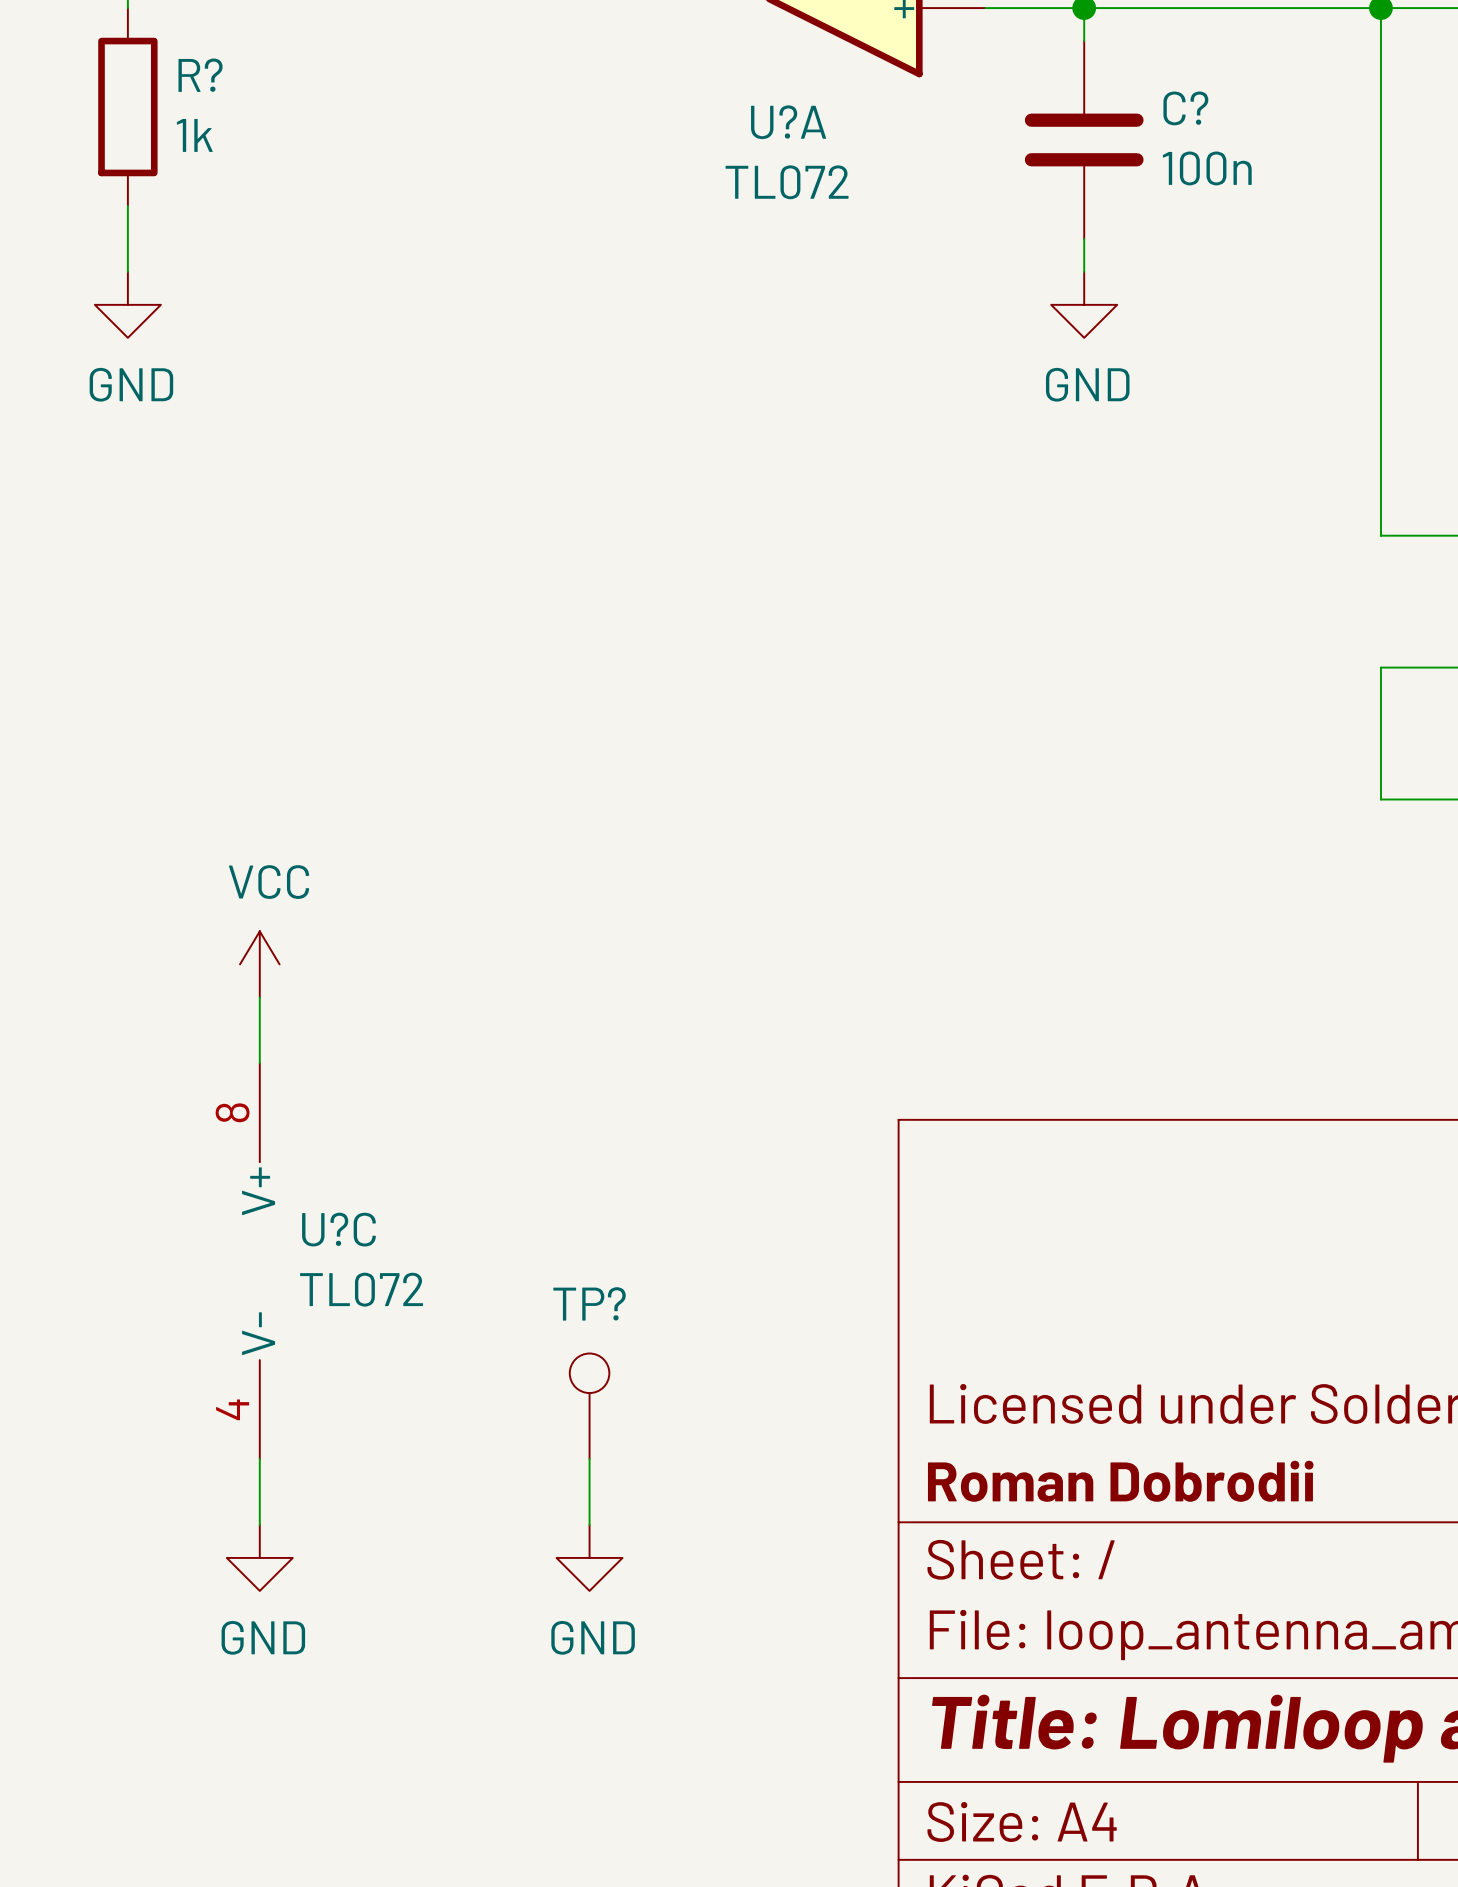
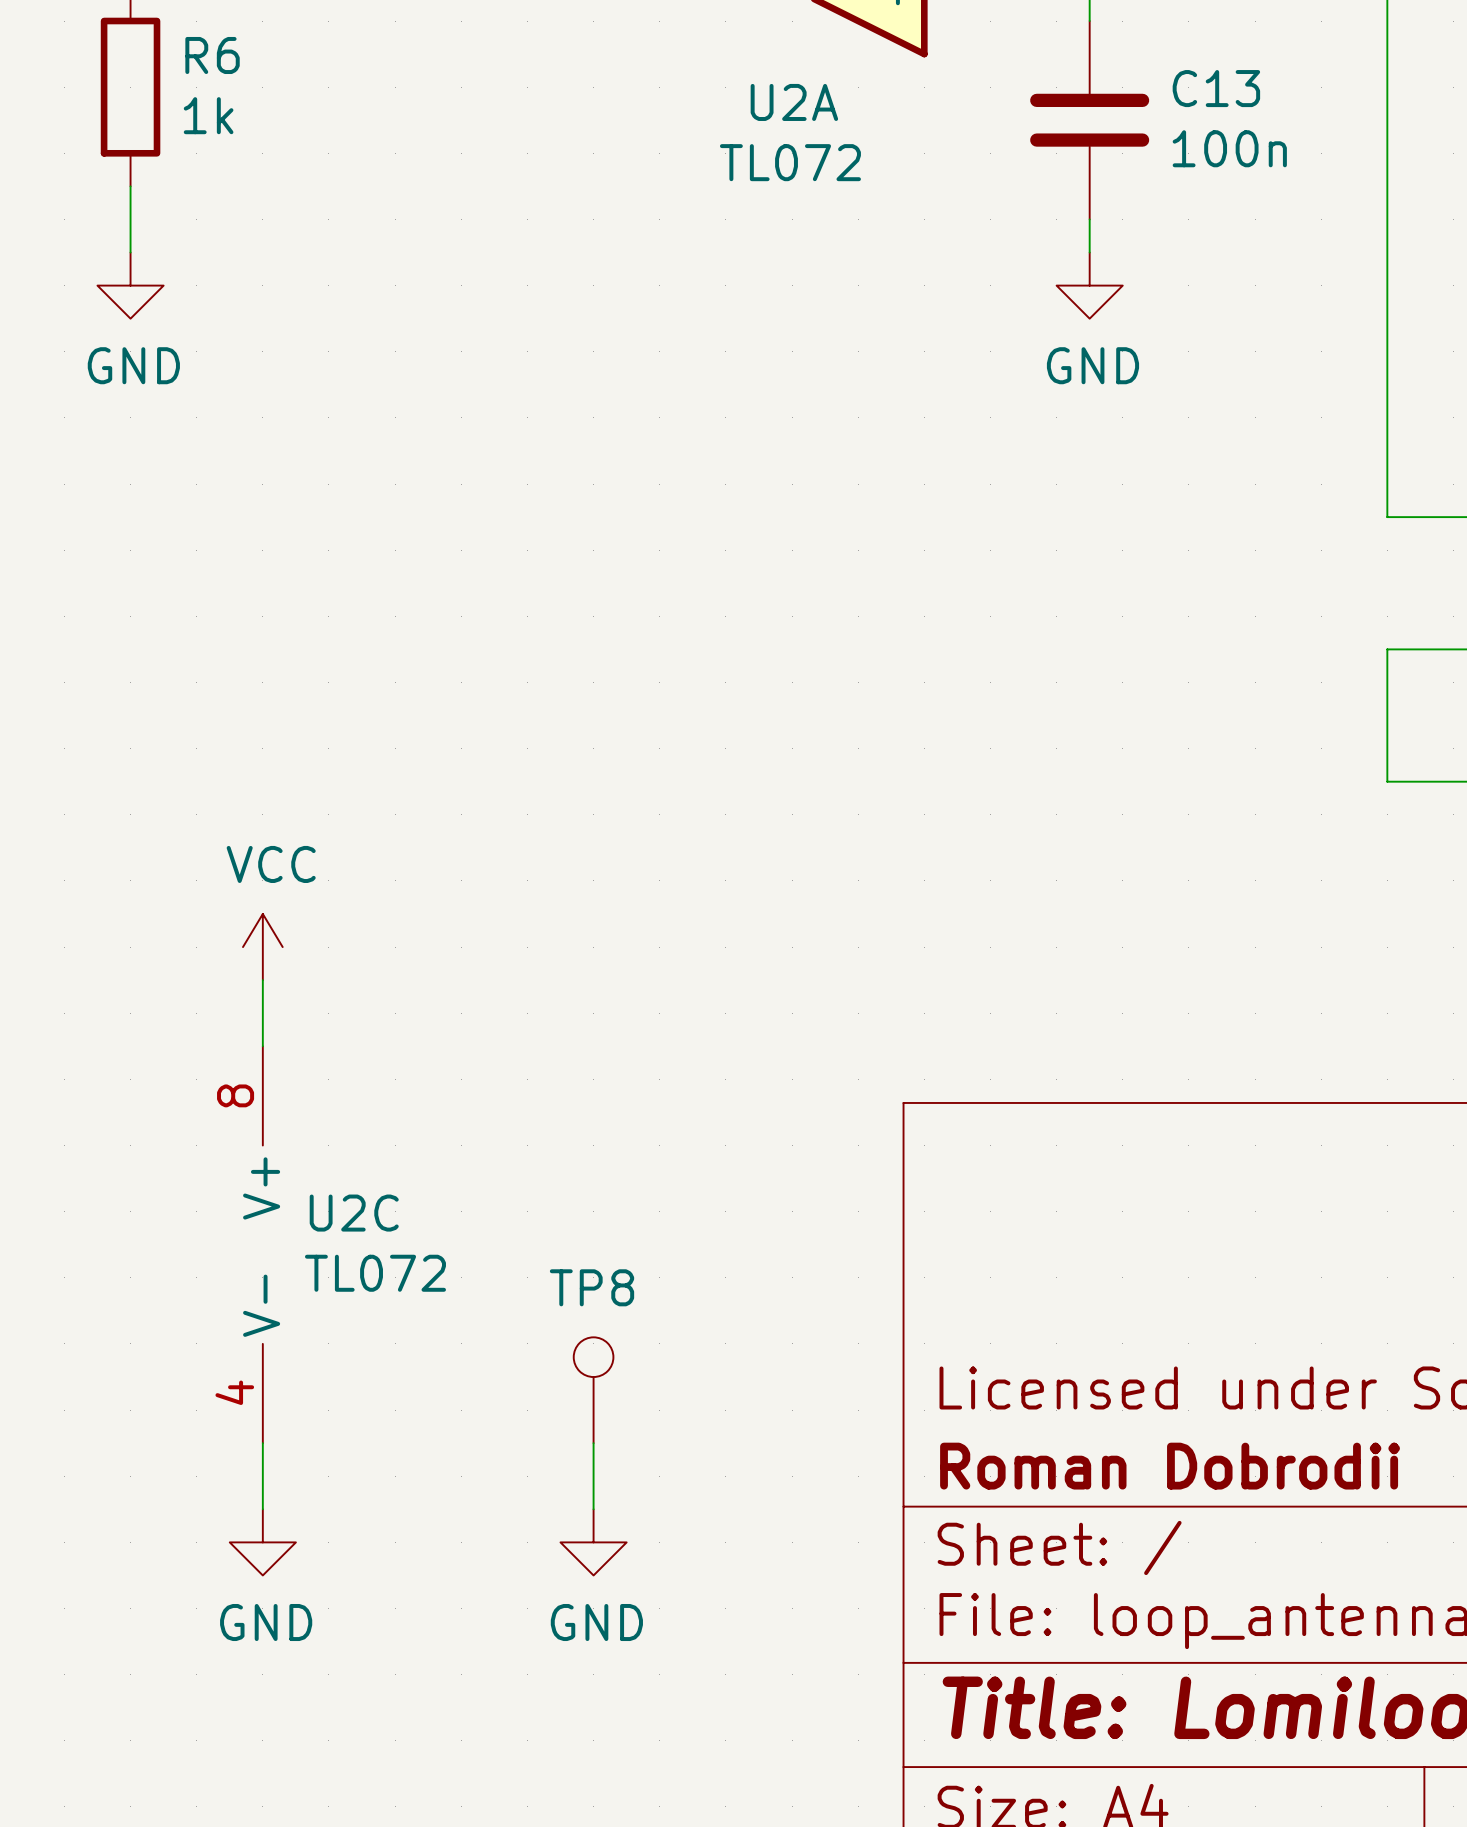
R? name: R? (200, 75) -> R6 (212, 55)
C? name: C? (1185, 108) -> C13 (1216, 88)
U?A name: U?A (788, 122) -> U2A (794, 102)
U?C name: U?C (338, 1229) -> U2C (354, 1213)
TP? name: TP? (589, 1303) -> TP8 (592, 1287)

